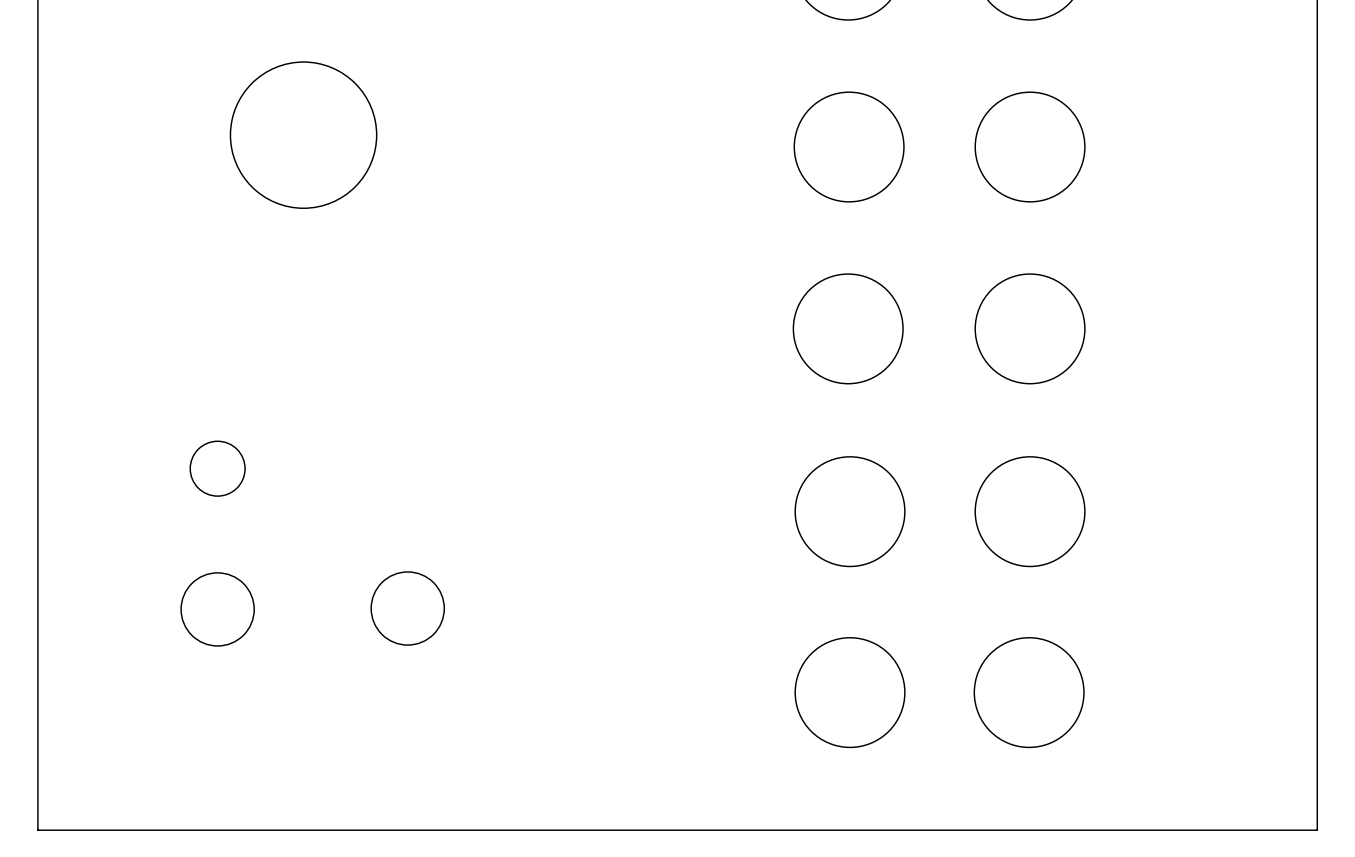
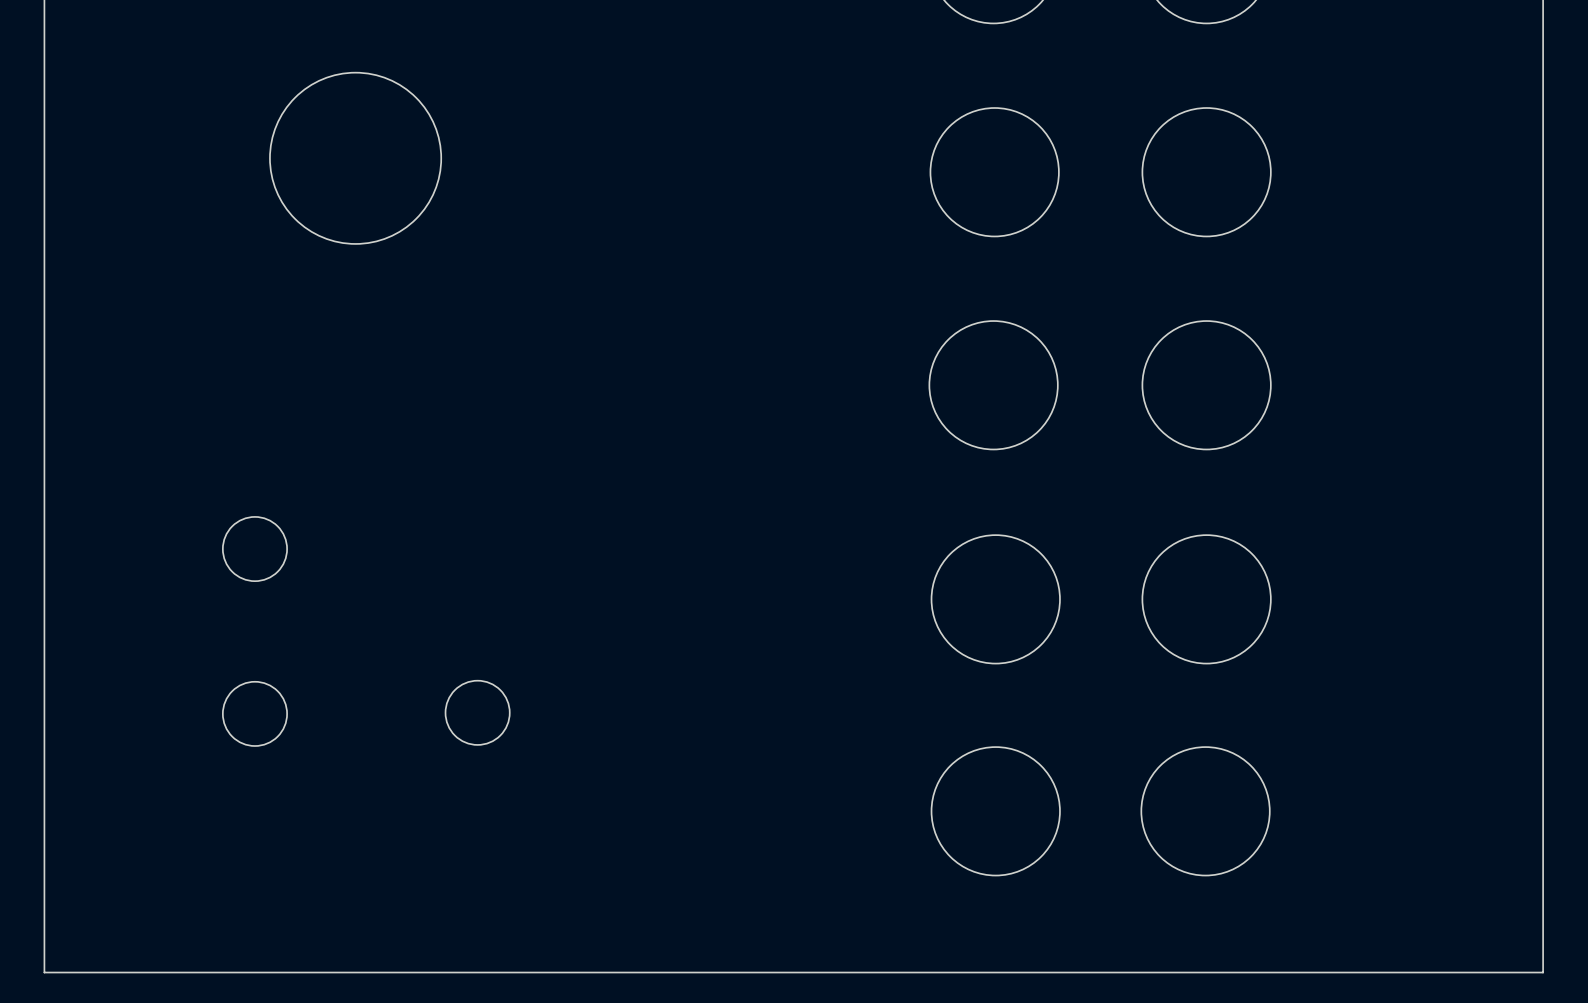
round board edge size: [370, 571, 445, 646] -> [444, 680, 511, 746]
round board edge size: [180, 572, 255, 647] -> [222, 681, 288, 747]

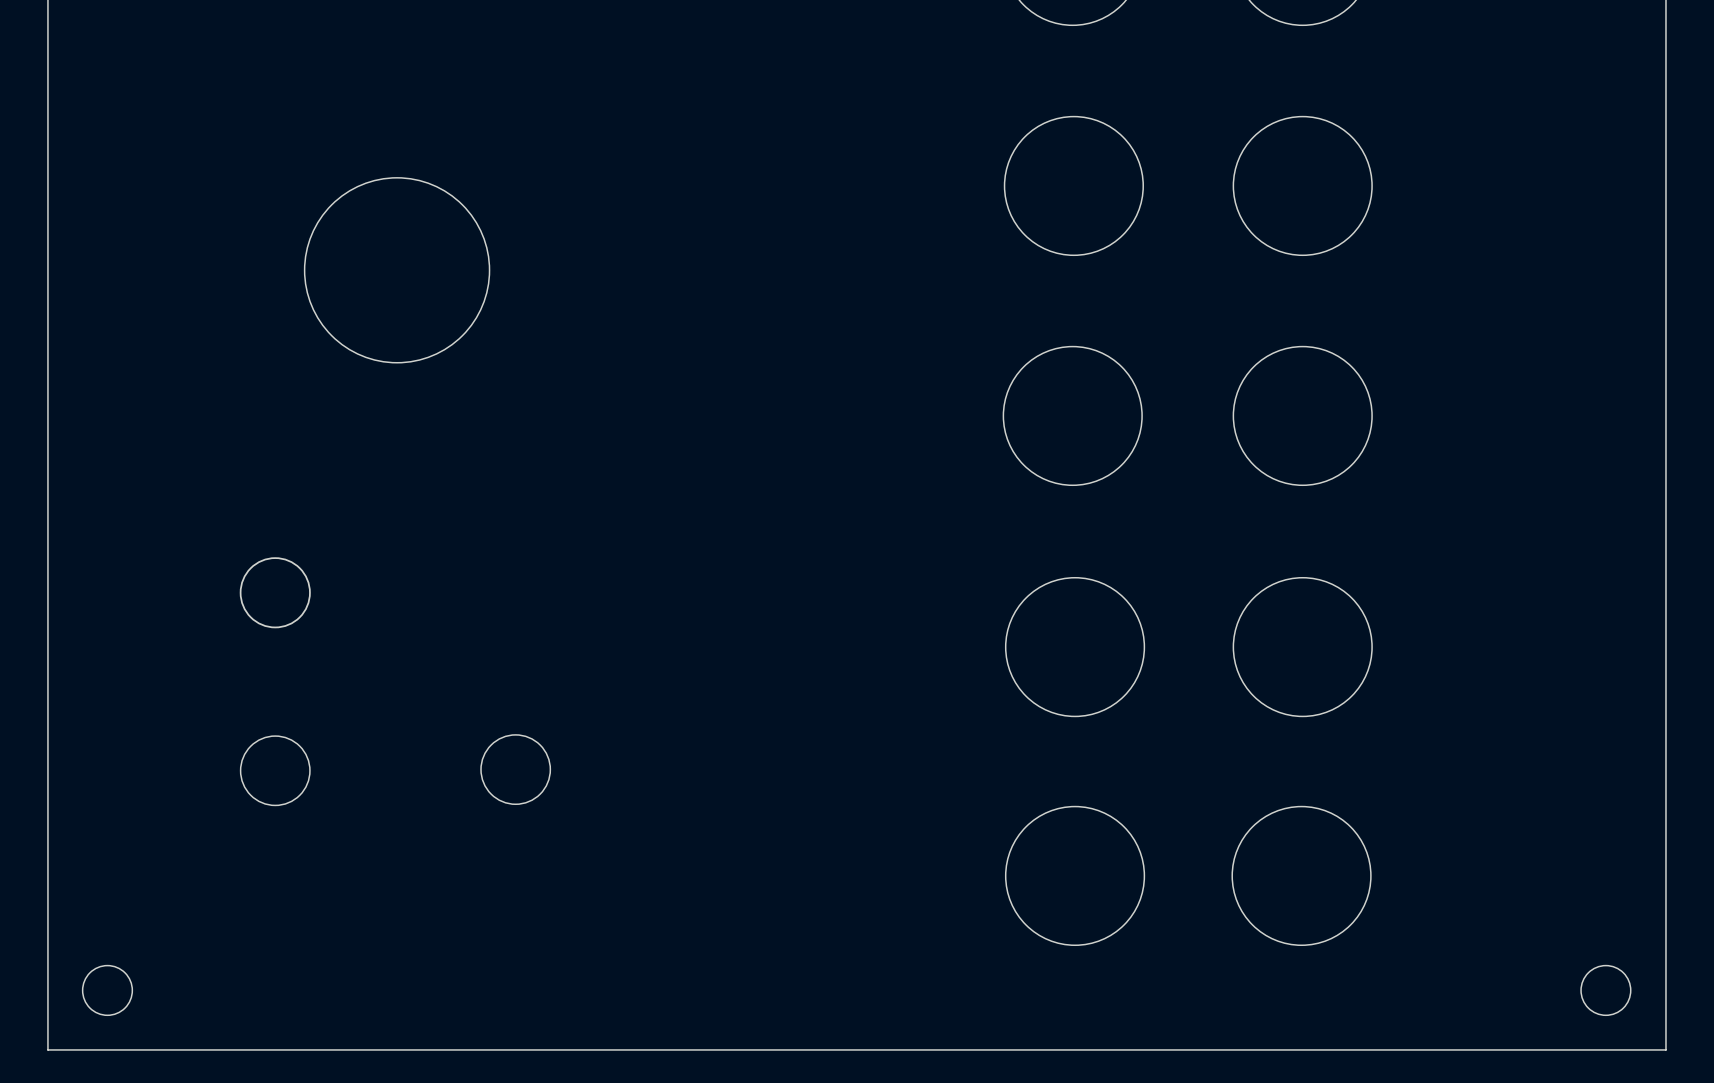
round board edge position: (355, 158) -> (397, 270)
round board edge: none -> [82, 965, 133, 1016]
round board edge: none -> [1580, 965, 1632, 1016]

